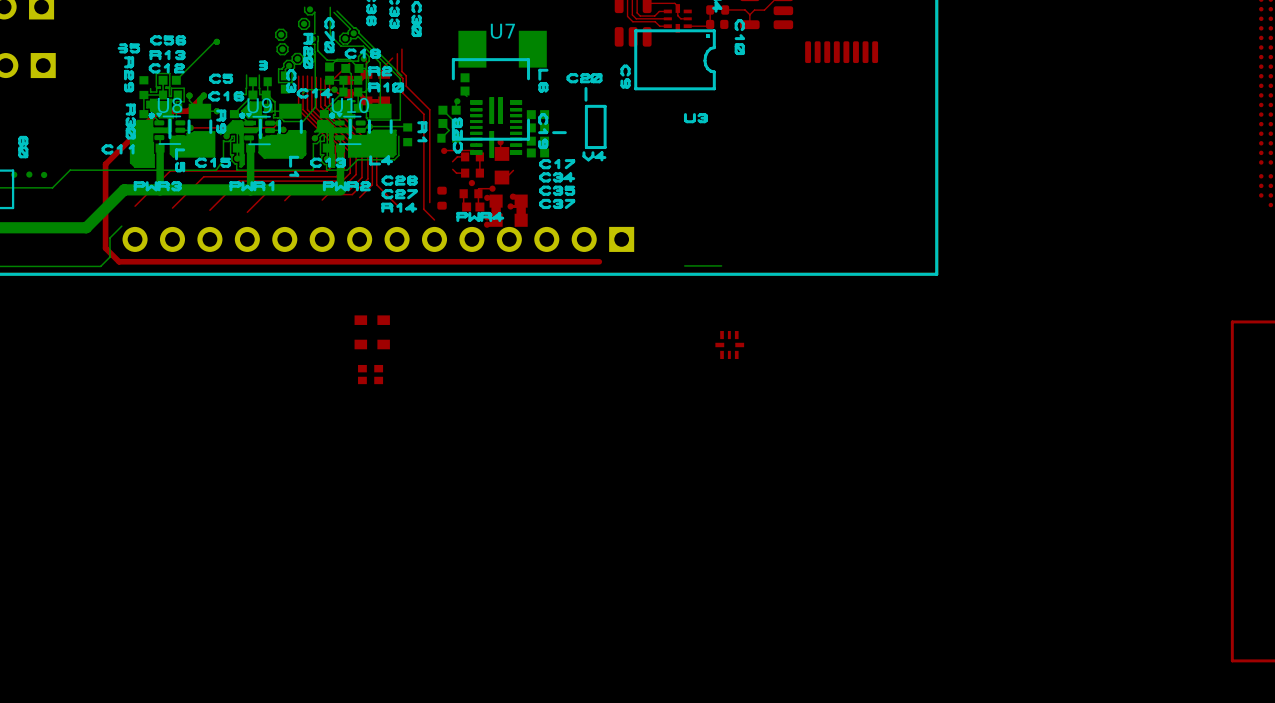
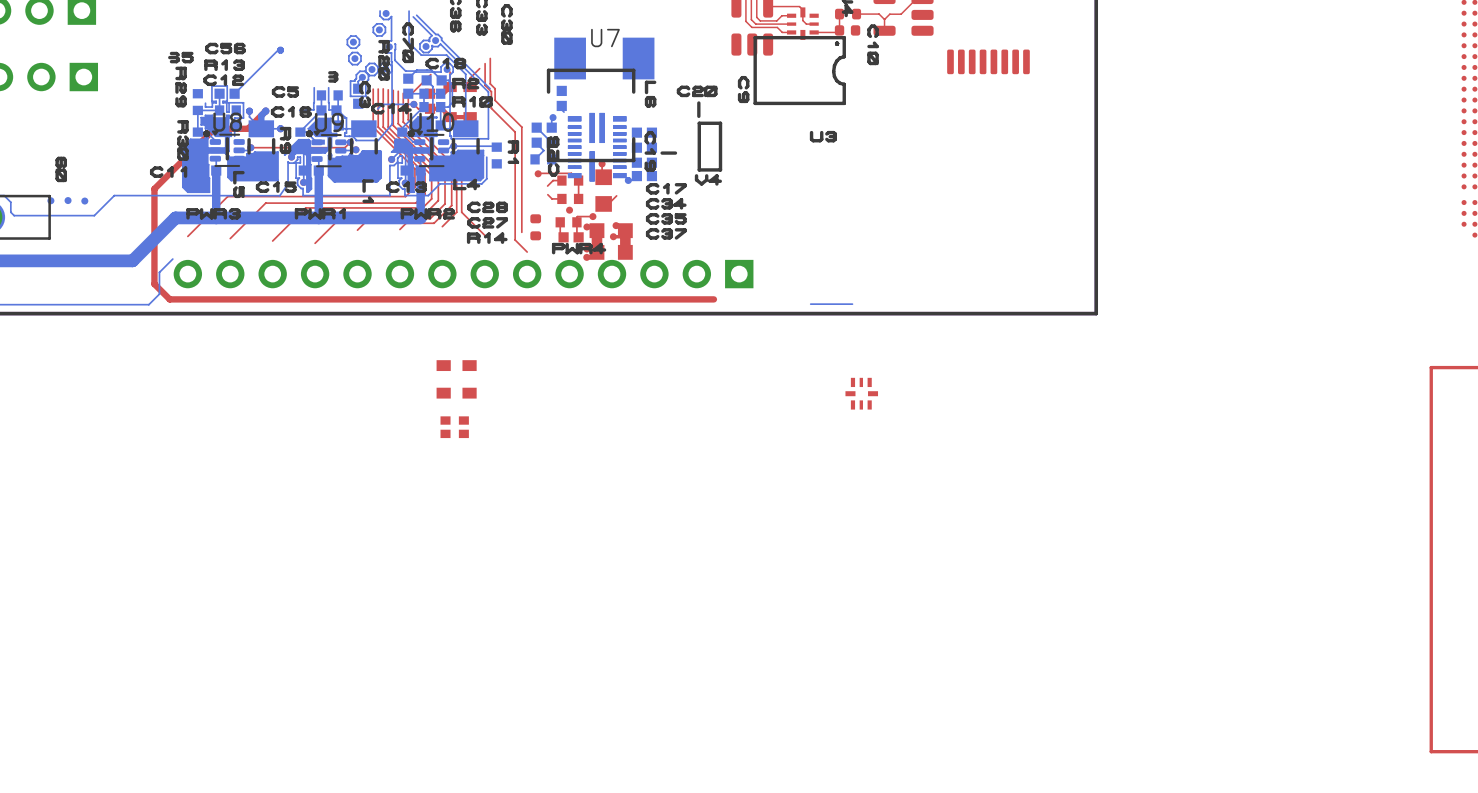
drawing: none -> [624, 176, 632, 184]

